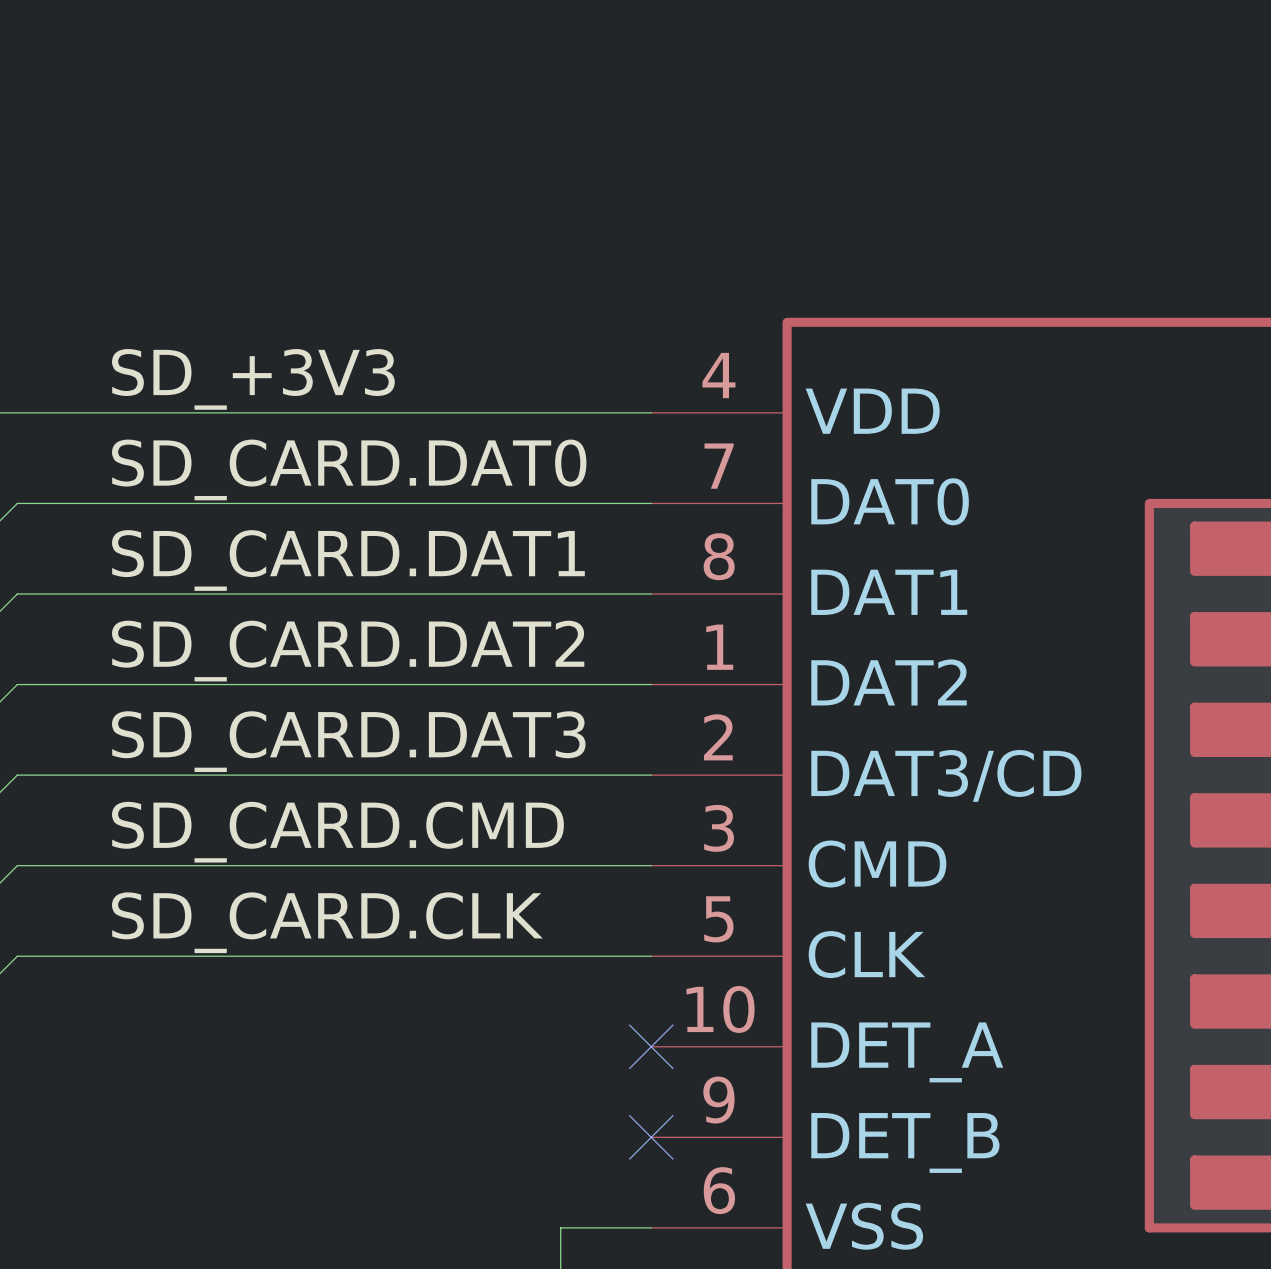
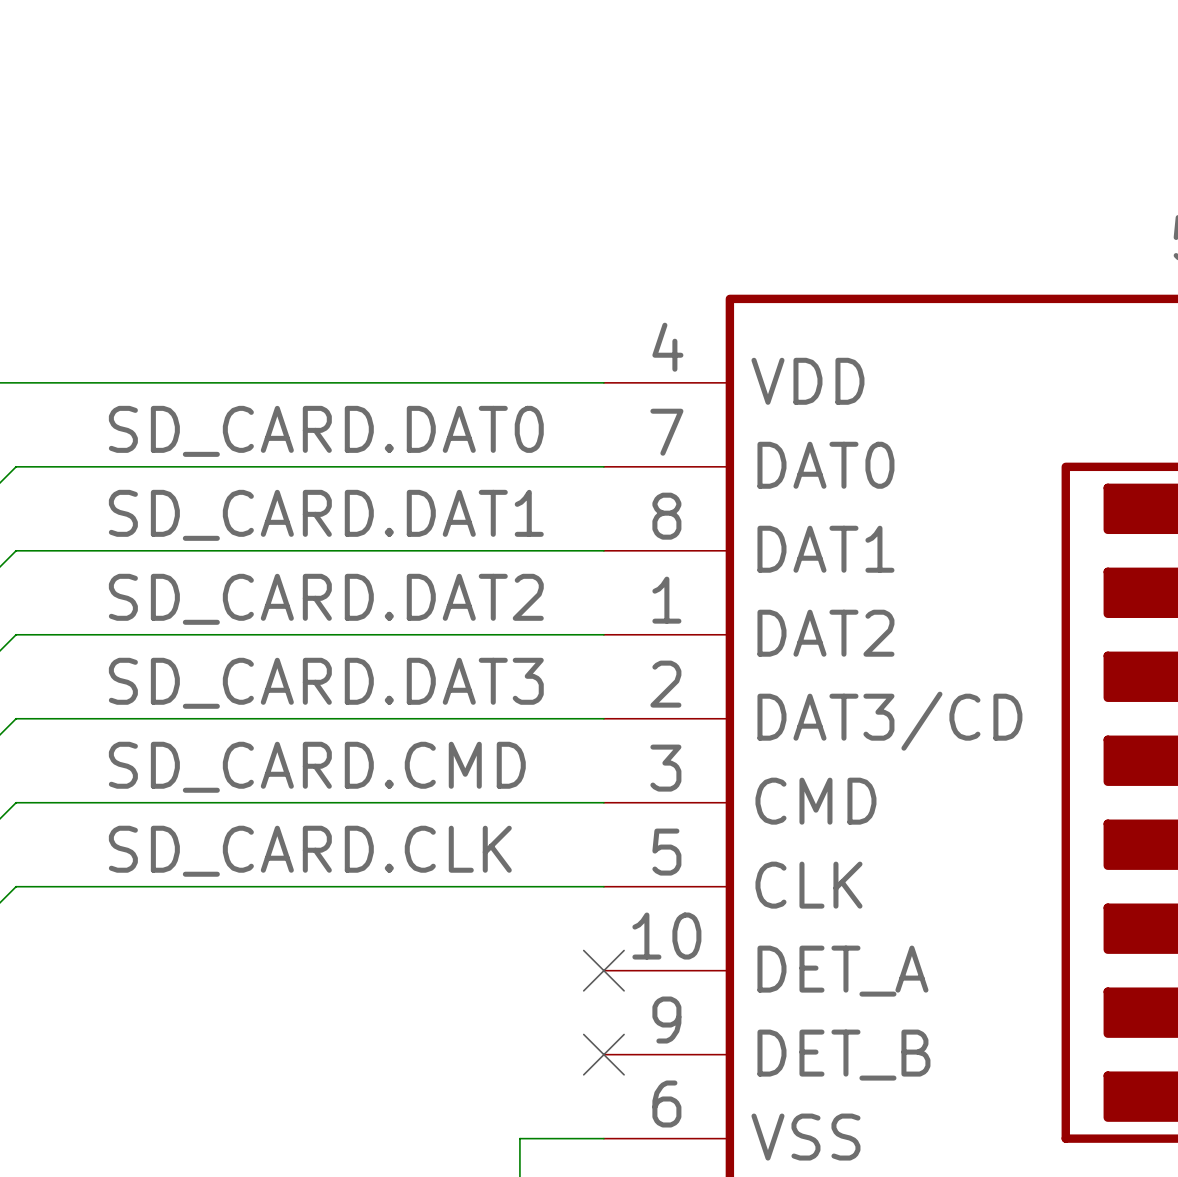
label: SD_+3V3 (253, 379) -> none

